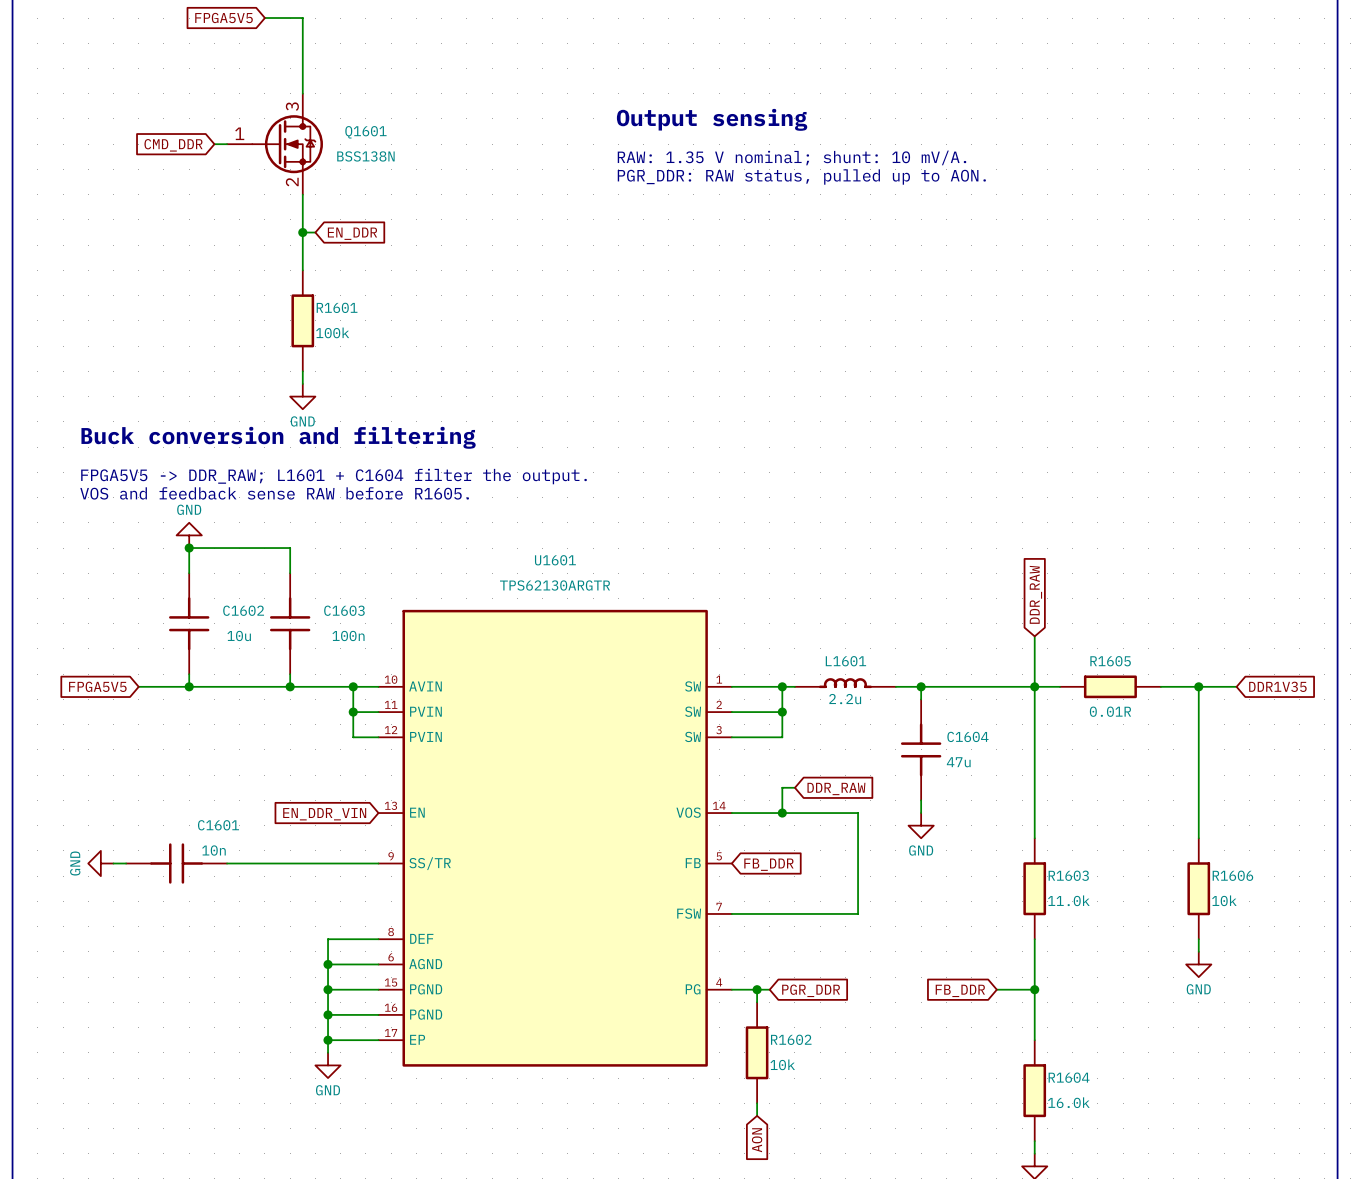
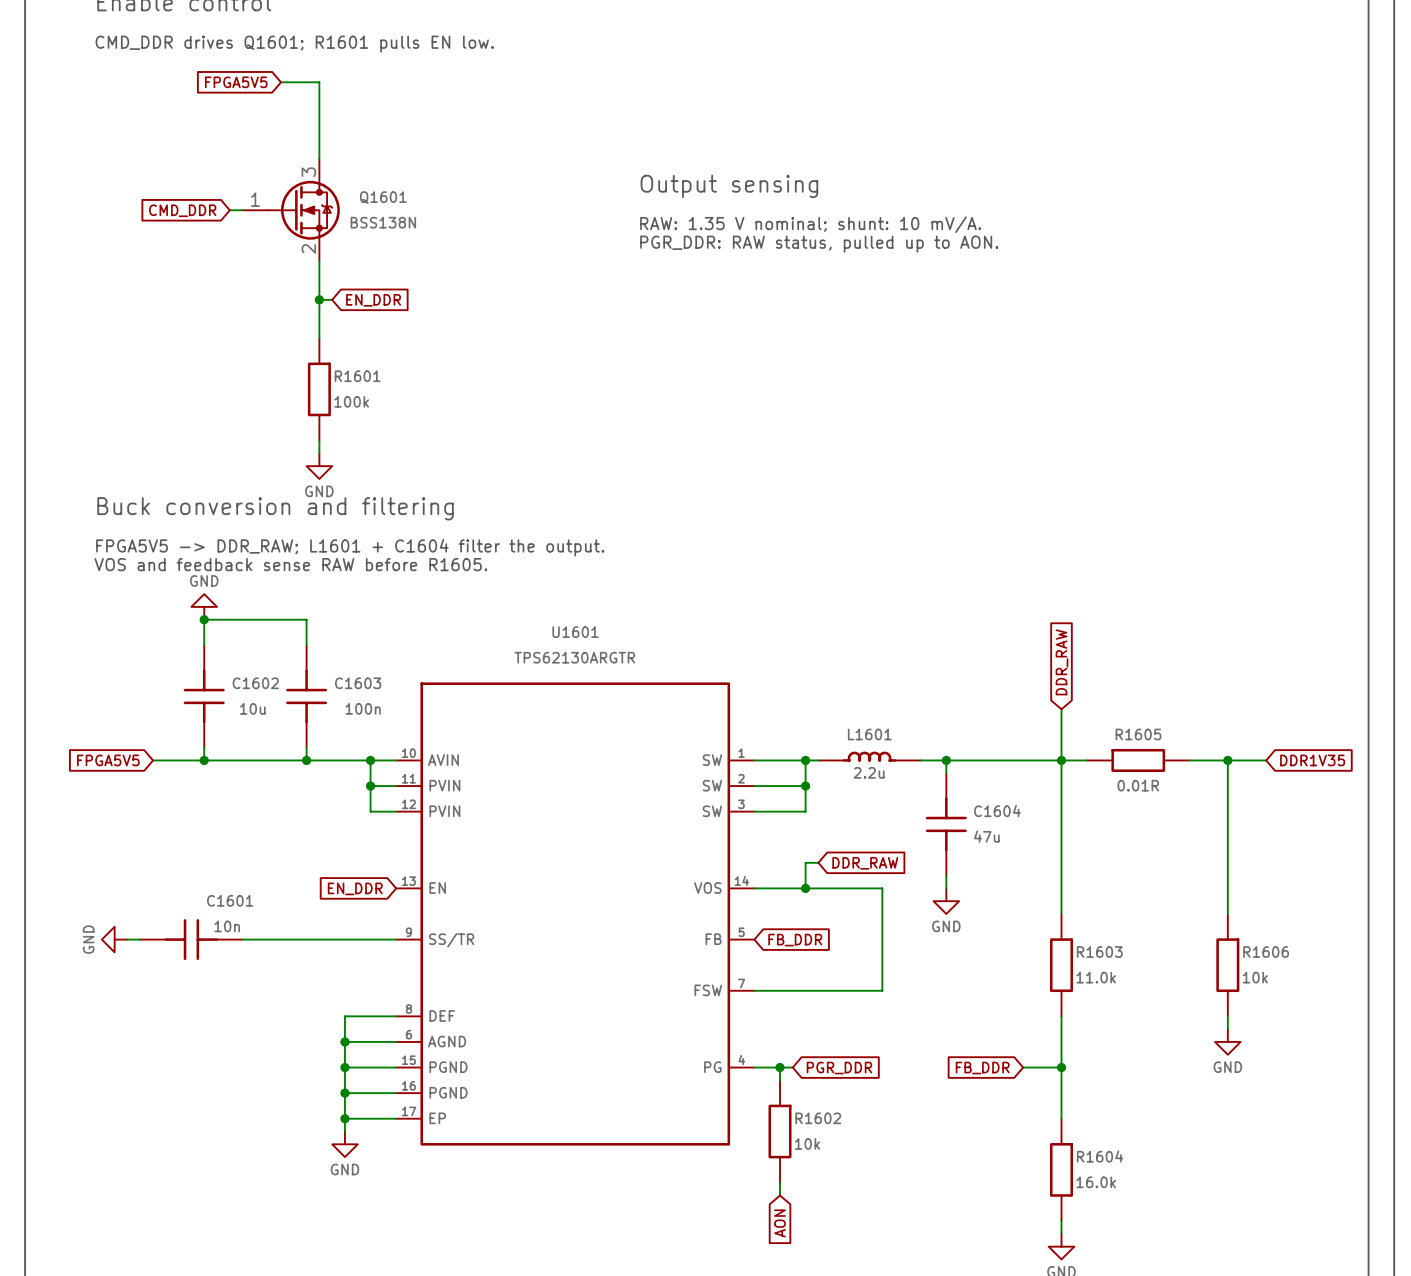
global label: EN_DDR_VIN (324, 814) -> EN_DDR (355, 888)

